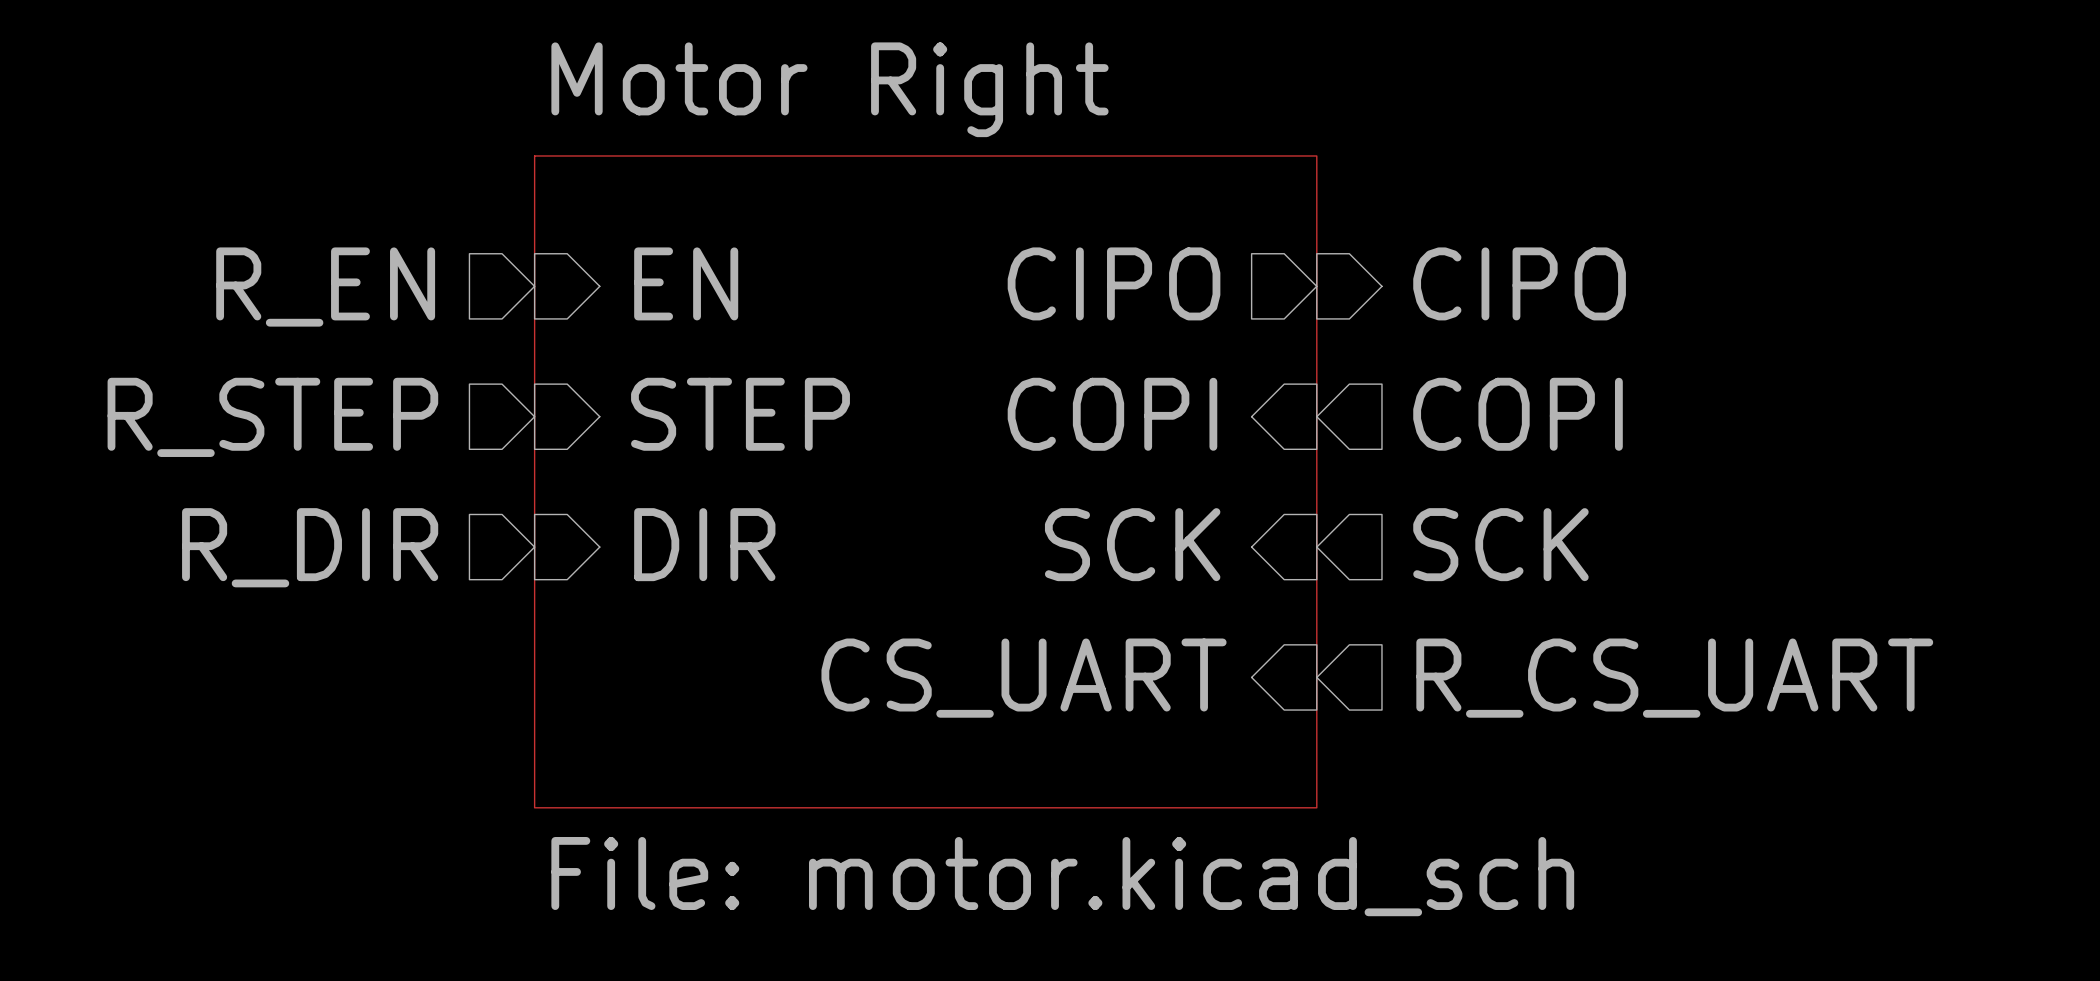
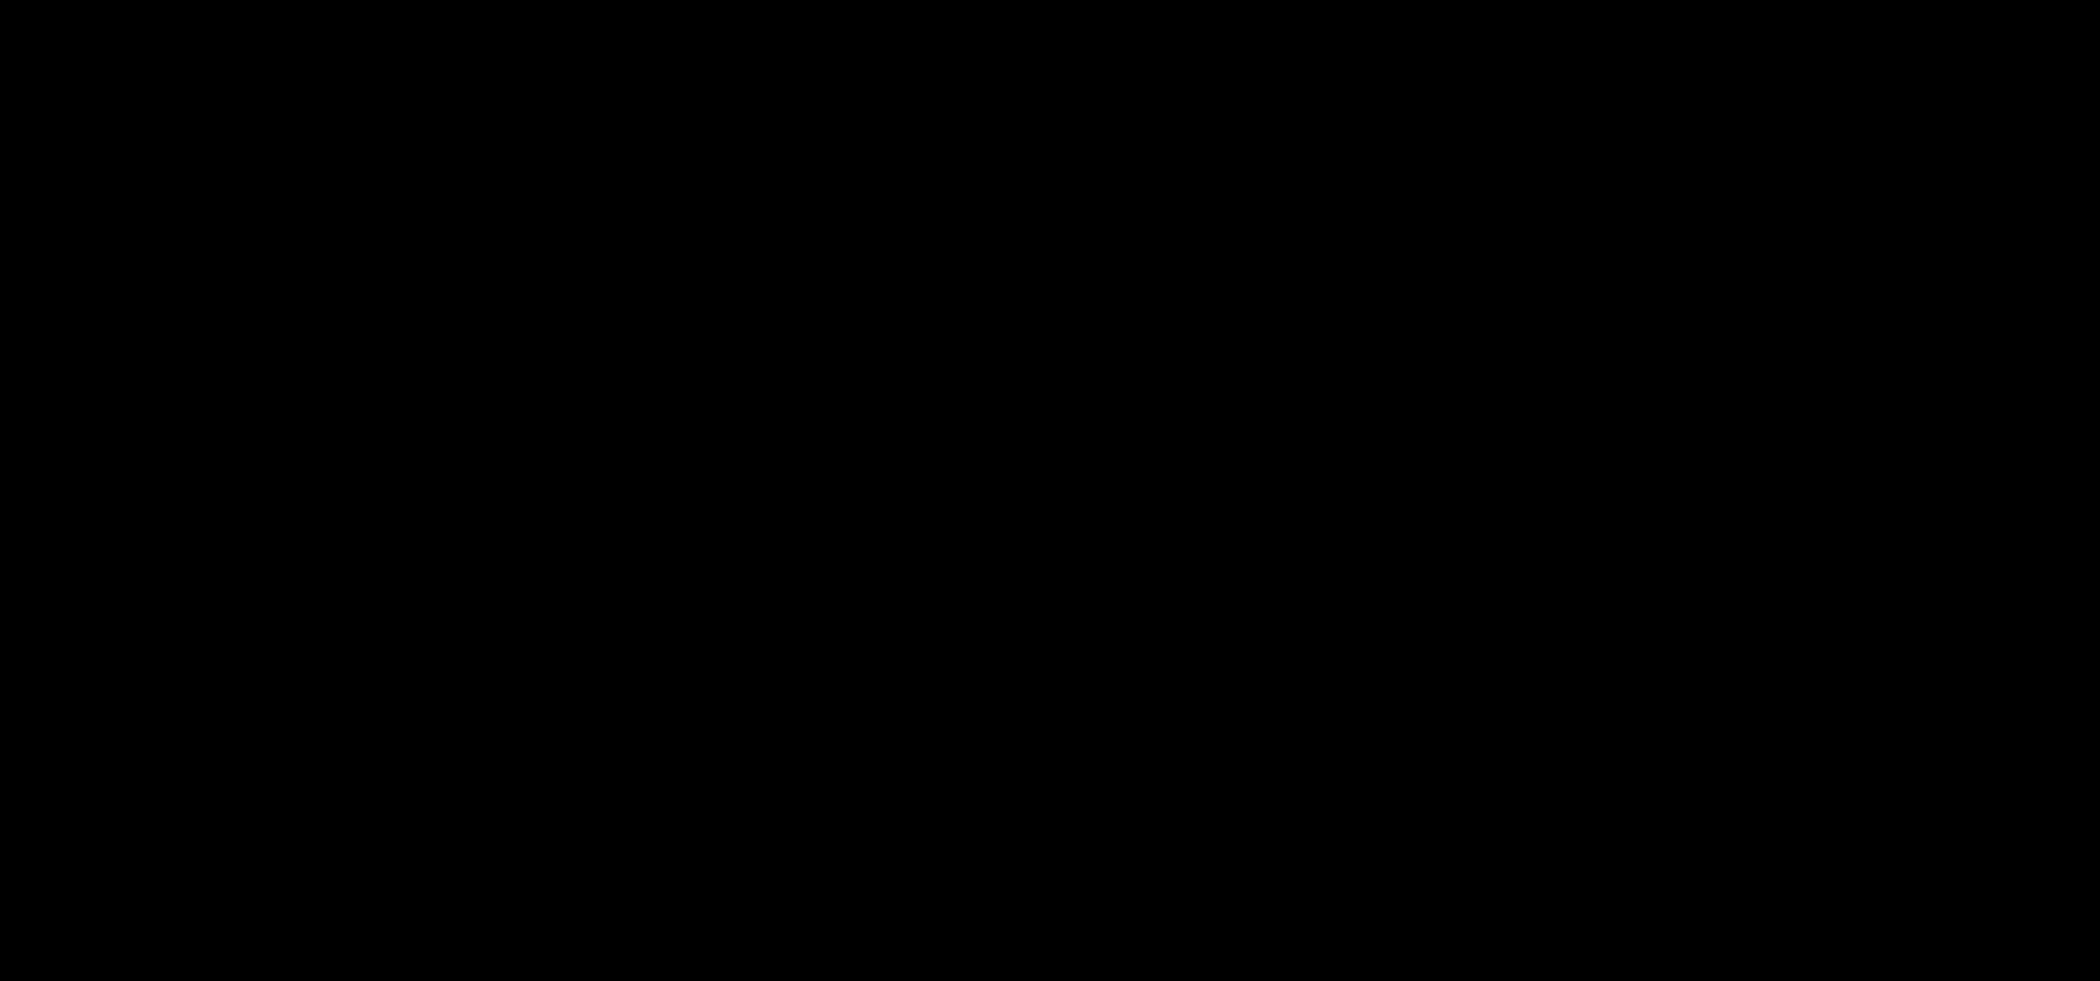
sheet pin: EN (686, 283) -> none
sheet pin: CIPO (1114, 283) -> none
hierarchical label: CIPO (1519, 283) -> none
hierarchical label: R_EN (325, 287) -> none
sheet pin: STEP (740, 414) -> none
sheet pin: COPI (1112, 414) -> none
hierarchical label: COPI (1518, 414) -> none
hierarchical label: R_STEP (272, 417) -> none
sheet Motor Right: File: motor.kicad_sch (925, 481) -> none
sheet pin: DIR (704, 544) -> none
sheet pin: SCK (1132, 544) -> none
hierarchical label: SCK (1500, 544) -> none
hierarchical label: R_DIR (310, 547) -> none
sheet pin: CS_UART (1024, 678) -> none
hierarchical label: R_CS_UART (1674, 678) -> none

